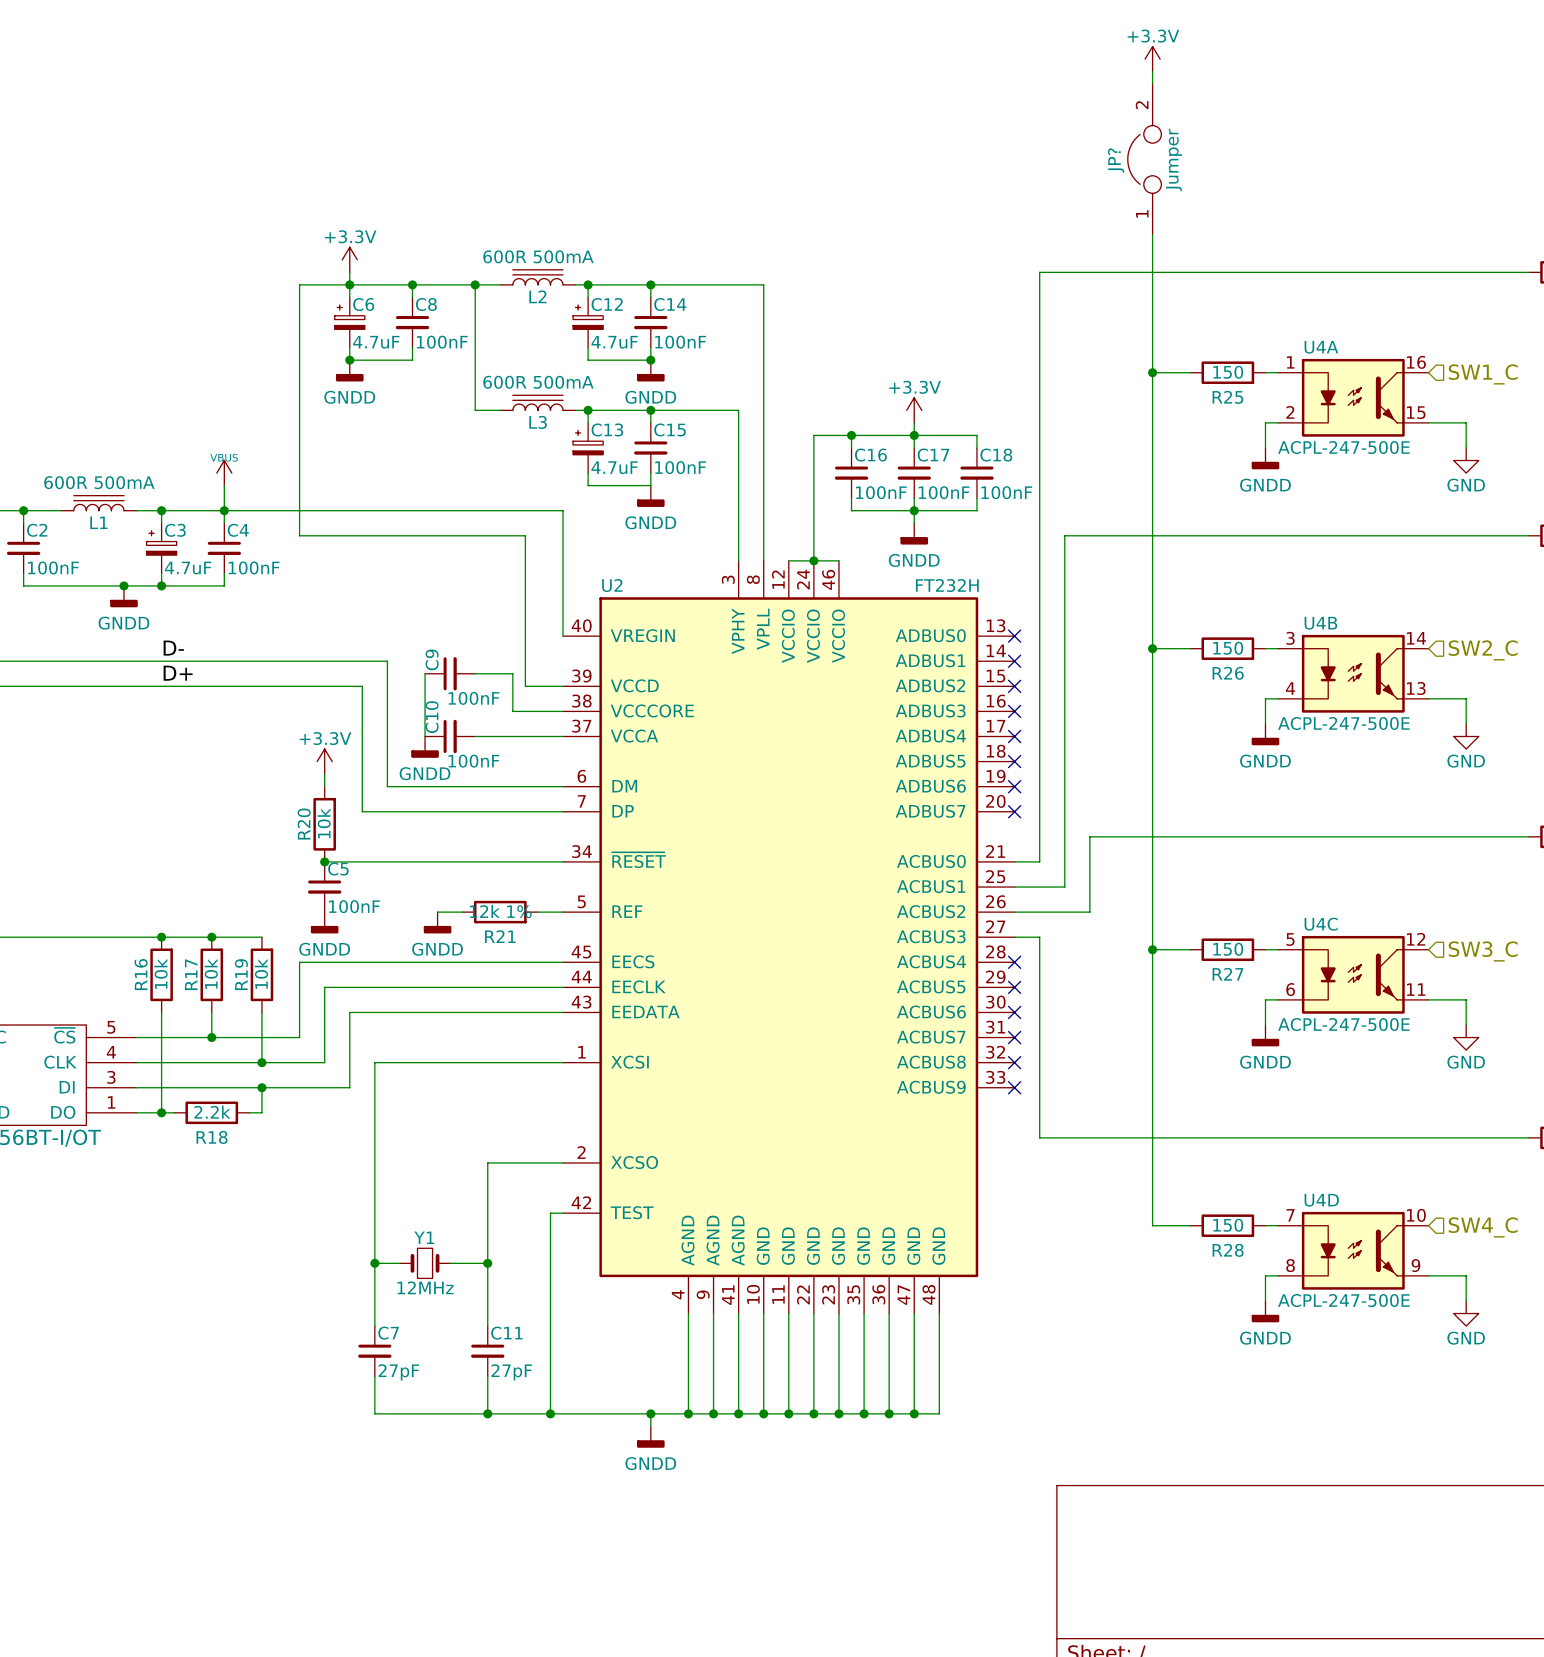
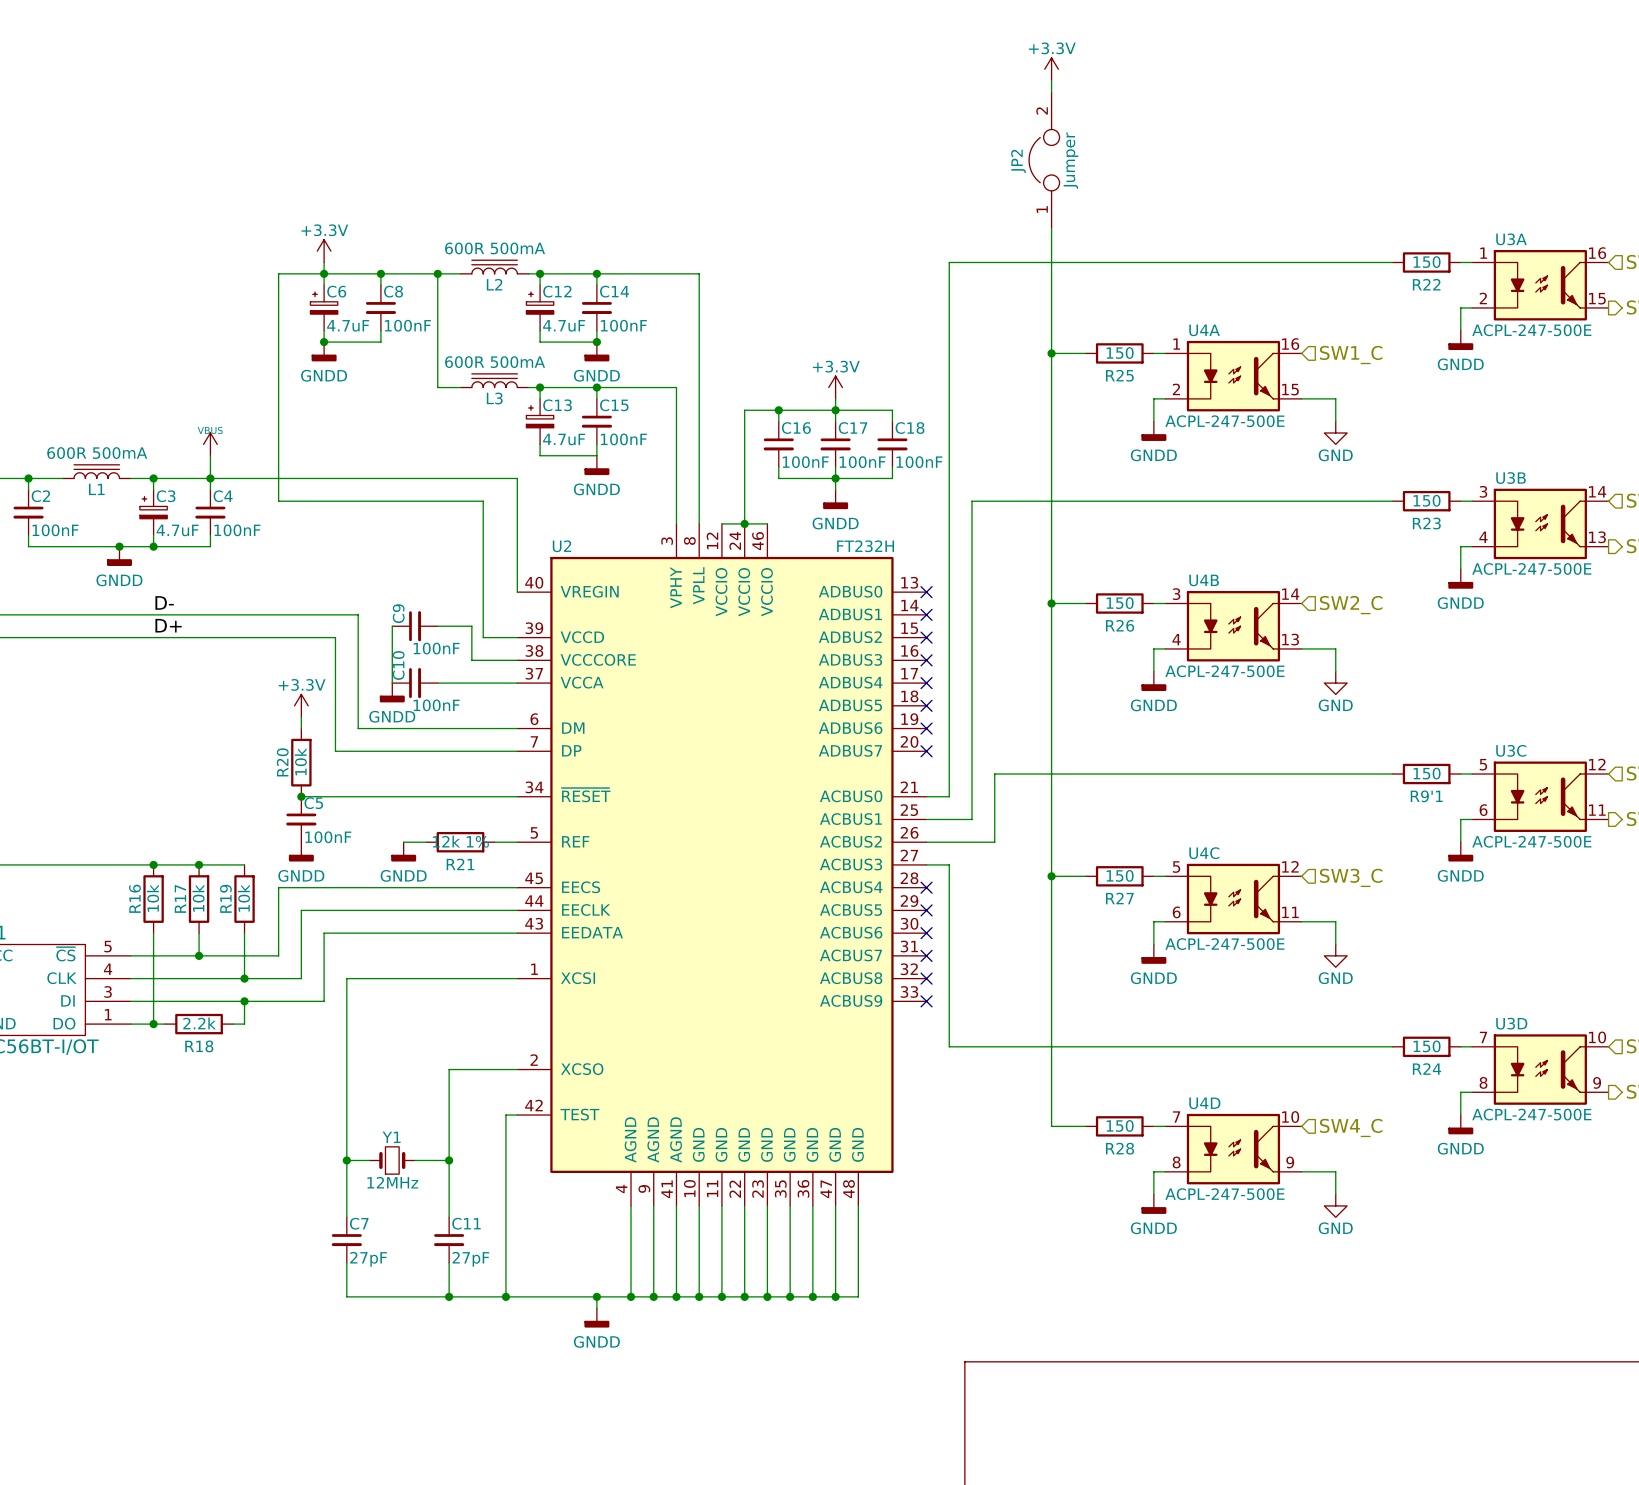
JP? name: JP? (1116, 160) -> JP2 (1018, 161)

